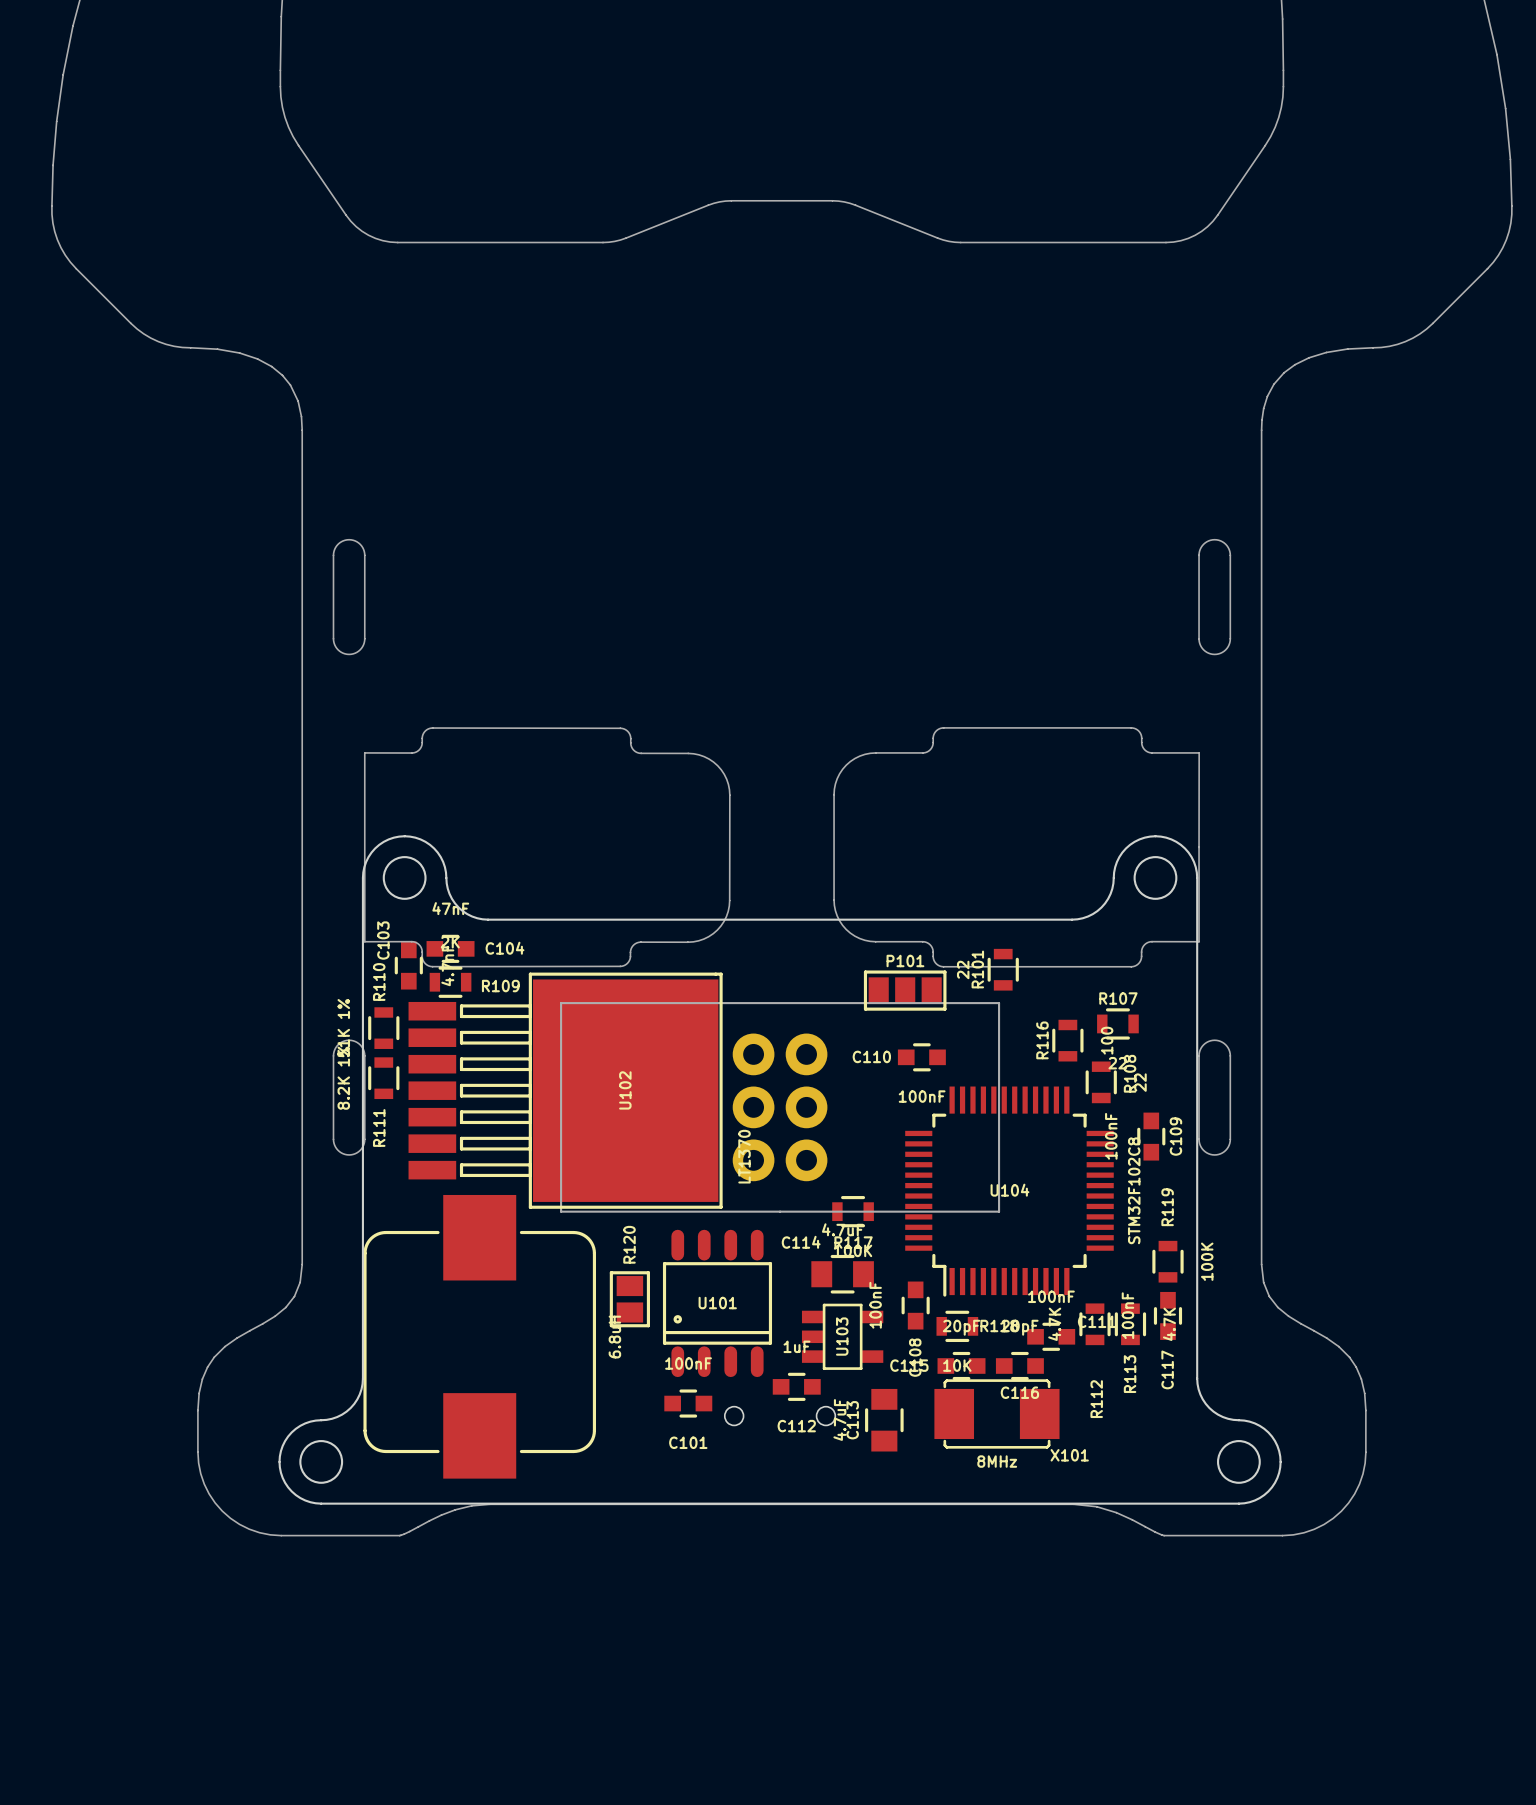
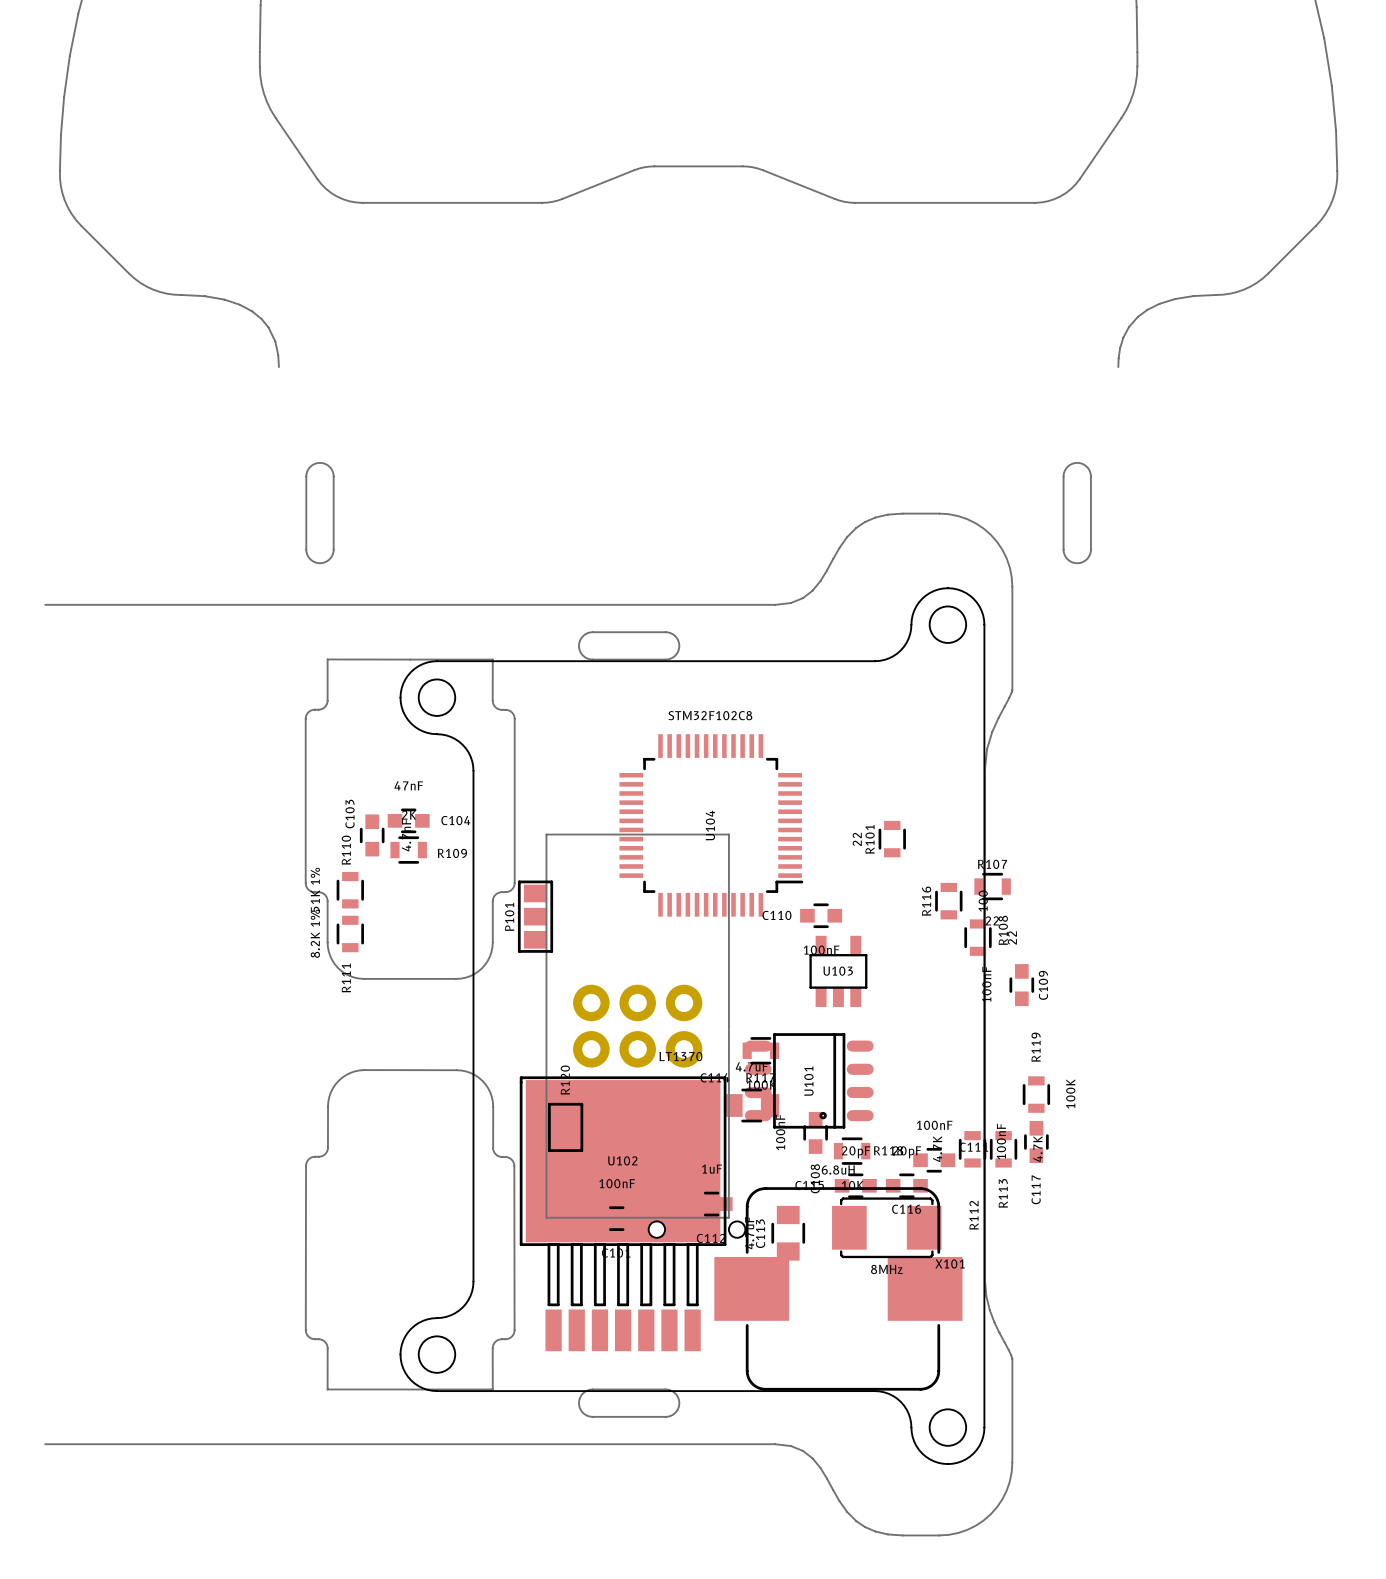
line: (302, 430) (302, 1264) (300, 1282) (294, 1296) (285, 1307) (275, 1316) (237, 1338) (214, 1357) (202, 1379) (197, 1410) (198, 1463) (209, 1493) (222, 1511) (239, 1524) (259, 1532) (281, 1535) -> none
line: (1261, 430) (1261, 1264) (1263, 1282) (1269, 1296) (1277, 1307) (1288, 1316) (1338, 1346) (1356, 1367) (1364, 1393) (1365, 1452) -> none
line: none -> (939, 513) (887, 514) (865, 522) (847, 537) (812, 590) (803, 598) (790, 603) (775, 604) (45, 604)
line: none -> (939, 513) (967, 519) (991, 535) (1002, 550) (1011, 577) (1012, 690) (992, 731) (987, 749) (984, 769) (984, 1279) (989, 1310) (1012, 1358) (1012, 1462)
line: none -> (592, 632) (667, 632) (676, 637) (679, 647) (675, 655) (667, 659) (590, 659) (582, 655) (578, 645) (582, 636) (592, 632)
line: (688, 753) (637, 752) (631, 746) (628, 732) (620, 728) (431, 728) (423, 733) (421, 746) (415, 752) (364, 752) (364, 941) (415, 942) (421, 948) (423, 961) (431, 966) (620, 966) (628, 962) (631, 947) (638, 942) (693, 941) (708, 936) (721, 925) (729, 906) (729, 789) (724, 774) (713, 762) (699, 754) (688, 753) -> none
line: (834, 794) (839, 773) (854, 758) (870, 753) (926, 752) (932, 746) (934, 733) (942, 728) (1132, 728) (1140, 733) (1142, 746) (1148, 752) (1199, 752) (1199, 941) (1148, 942) (1142, 948) (1140, 961) (1132, 966) (943, 966) (935, 962) (932, 948) (926, 942) (875, 941) -> none
line: (834, 794) (835, 910) (839, 920) (850, 933) (864, 940) (875, 941) -> none
board edge: (404, 836) (420, 839) (434, 848) (443, 861) (447, 888) (454, 903) (472, 916) (488, 919) (1077, 919) (1092, 914) (1105, 903) (1112, 888) (1116, 861) (1130, 844) (1139, 839) (1155, 836) (1171, 839) (1180, 844) (1191, 857) (1197, 877) (1197, 1383) (1202, 1399) (1213, 1411) (1228, 1418) (1254, 1423) (1271, 1436) (1277, 1445) (1280, 1461) (1277, 1477) (1271, 1487) (1254, 1500) (1238, 1503) (321, 1503) (305, 1500) (295, 1495) (285, 1482) (280, 1472) (279, 1456) (285, 1441) (291, 1432) (305, 1423) (332, 1418) (346, 1411) (357, 1399) (362, 1383) (363, 872) (368, 857) (379, 844) (388, 839) (404, 836) -> (947, 588) (933, 590) (922, 598) (914, 610) (910, 634) (903, 646) (893, 656) (879, 660) (436, 661) (418, 666) (405, 679) (400, 697) (403, 711) (408, 719) (423, 731) (446, 735) (459, 741) (468, 752) (473, 770) (473, 1286) (468, 1299) (459, 1310) (446, 1316) (423, 1320) (411, 1328) (405, 1336) (400, 1349) (401, 1364) (408, 1376) (418, 1386) (436, 1391) (879, 1391) (893, 1395) (903, 1405) (910, 1418) (914, 1441) (922, 1453) (929, 1459) (943, 1463) (957, 1462) (970, 1456) (979, 1445) (984, 1427) (984, 624) (981, 610) (973, 598) (961, 590) (947, 588)
round board edge position: (404, 877) -> (436, 697)
round board edge position: (1155, 877) -> (947, 624)
line: none -> (546, 834) (728, 834) (728, 1217) (546, 1217) (546, 834)
P101 rotation: 0° (905, 990) -> 90° clockwise (535, 916)
P101 position: (905, 990) -> (535, 916)
line: (561, 1003) (999, 1003) (999, 1211) (561, 1211) (561, 1003) -> none
line: (333, 1055) (333, 1141) (339, 1151) (351, 1154) (360, 1150) (364, 1141) (364, 1053) (358, 1043) (347, 1040) (338, 1044) (333, 1055) -> none
line: (1199, 1055) (1199, 1141) (1205, 1151) (1216, 1154) (1225, 1150) (1230, 1141) (1230, 1053) (1224, 1043) (1214, 1040) (1203, 1044) (1199, 1055) -> none
line: none -> (492, 942) (493, 897) (498, 892) (511, 890) (514, 883) (514, 717) (510, 711) (498, 709) (493, 704) (492, 659) (327, 659) (326, 704) (321, 709) (310, 710) (305, 717) (305, 884) (310, 890) (321, 892) (326, 897) (327, 947) (332, 960) (345, 974) (364, 978)
line: none -> (492, 942) (491, 951) (485, 964) (478, 971) (465, 977) (364, 978)
U102 rotation: 0° (565, 1090) -> 90° counterclockwise (623, 1213)
U102 position: (565, 1090) -> (623, 1213)
part rotation: 0° (780, 1107) -> 90° clockwise (637, 1026)
part position: (780, 1107) -> (637, 1026)
U104 rotation: 0° (1009, 1191) -> 90° counterclockwise (711, 825)
U104 position: (1009, 1191) -> (711, 825)
line: none -> (328, 1106) (329, 1097) (335, 1084) (346, 1074) (359, 1070) (461, 1070) (475, 1075) (488, 1088) (492, 1102) (493, 1150) (497, 1155) (511, 1159) (514, 1165) (514, 1331) (510, 1337) (498, 1339) (493, 1344) (492, 1389) (327, 1389) (326, 1344) (322, 1339) (309, 1337) (305, 1330) (306, 1164) (310, 1157) (322, 1156) (327, 1151) (328, 1106)
U101 rotation: 0° (717, 1303) -> 90° counterclockwise (809, 1080)
U101 position: (717, 1303) -> (809, 1080)
part rotation: 0° (479, 1336) -> 90° counterclockwise (838, 1288)
part position: (479, 1336) -> (838, 1288)
U103 rotation: 0° (842, 1336) -> 90° counterclockwise (838, 971)
U103 position: (842, 1336) -> (838, 971)
line: (1365, 1452) (1359, 1484) (1341, 1511) (1324, 1524) (1293, 1534) (1164, 1535) (1116, 1512) (1096, 1506) (1073, 1504) (489, 1504) (455, 1509) (399, 1535) (281, 1535) -> none
round board edge position: (321, 1461) -> (436, 1354)
round board edge position: (1238, 1461) -> (947, 1427)
line: none -> (592, 1389) (667, 1389) (676, 1394) (679, 1404) (675, 1412) (667, 1416) (590, 1416) (582, 1412) (578, 1403) (583, 1393) (592, 1389)
line: none -> (45, 1444) (775, 1444) (790, 1446) (803, 1450) (812, 1458) (820, 1467) (839, 1501) (856, 1521) (875, 1531) (902, 1535) (948, 1534) (975, 1525) (990, 1514) (1002, 1499) (1009, 1481) (1012, 1462)

